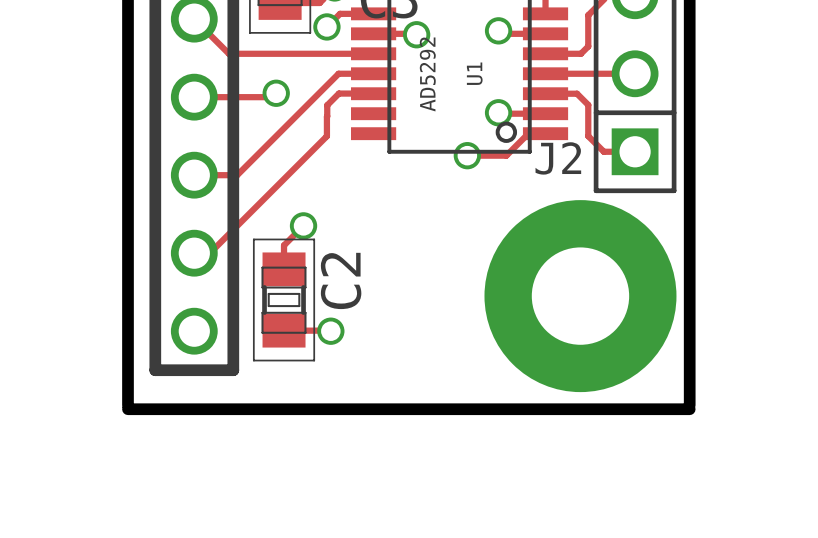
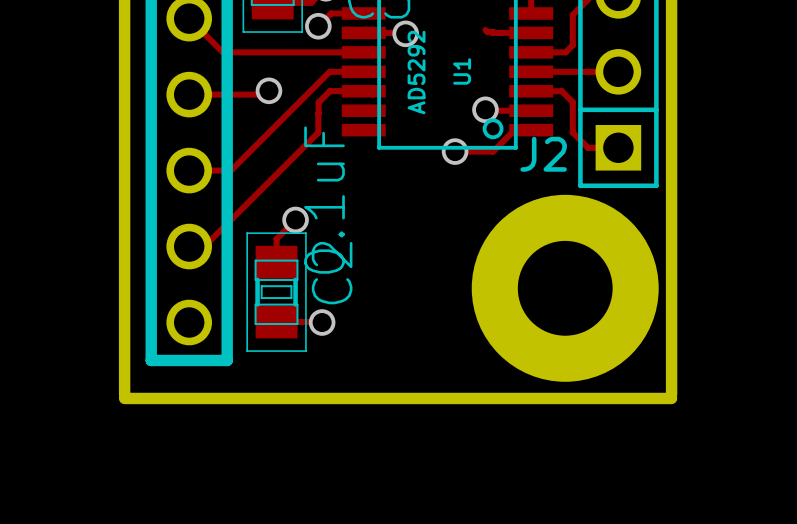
via: (498, 30) -> none
C2 value: none -> 0.1uF (324, 200)

